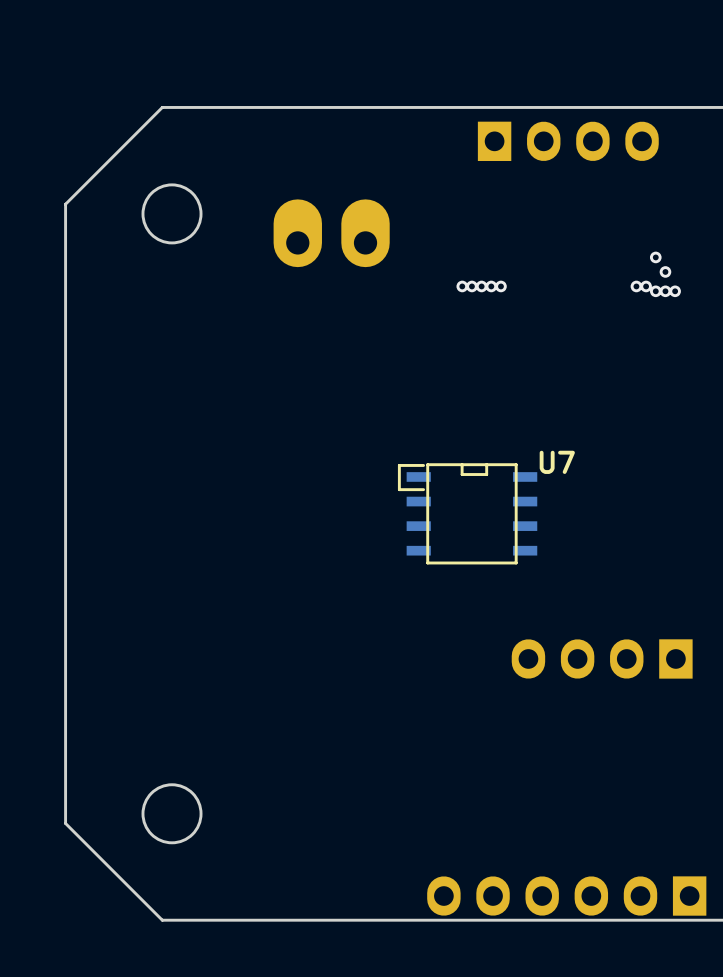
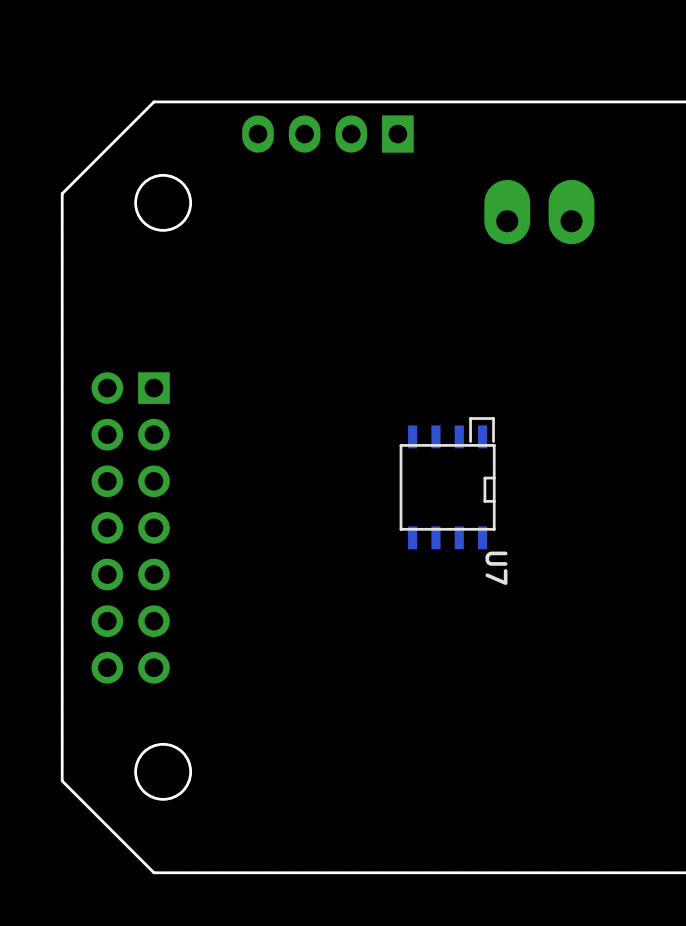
part rotation: 0° (568, 141) -> 180° (327, 134)
part position: (568, 141) -> (327, 134)
part position: (331, 233) -> (539, 212)
via: (655, 257) -> none
via: (665, 271) -> none
via: (462, 286) -> none
via: (471, 286) -> none
via: (481, 286) -> none
via: (491, 286) -> none
via: (500, 286) -> none
via: (636, 286) -> none
via: (646, 286) -> none
via: (655, 291) -> none
via: (665, 291) -> none
via: (675, 291) -> none
U7 rotation: 0° (467, 513) -> 90° clockwise (447, 483)
part: none -> (130, 527)
part: (602, 658) -> none
part: (566, 896) -> none

